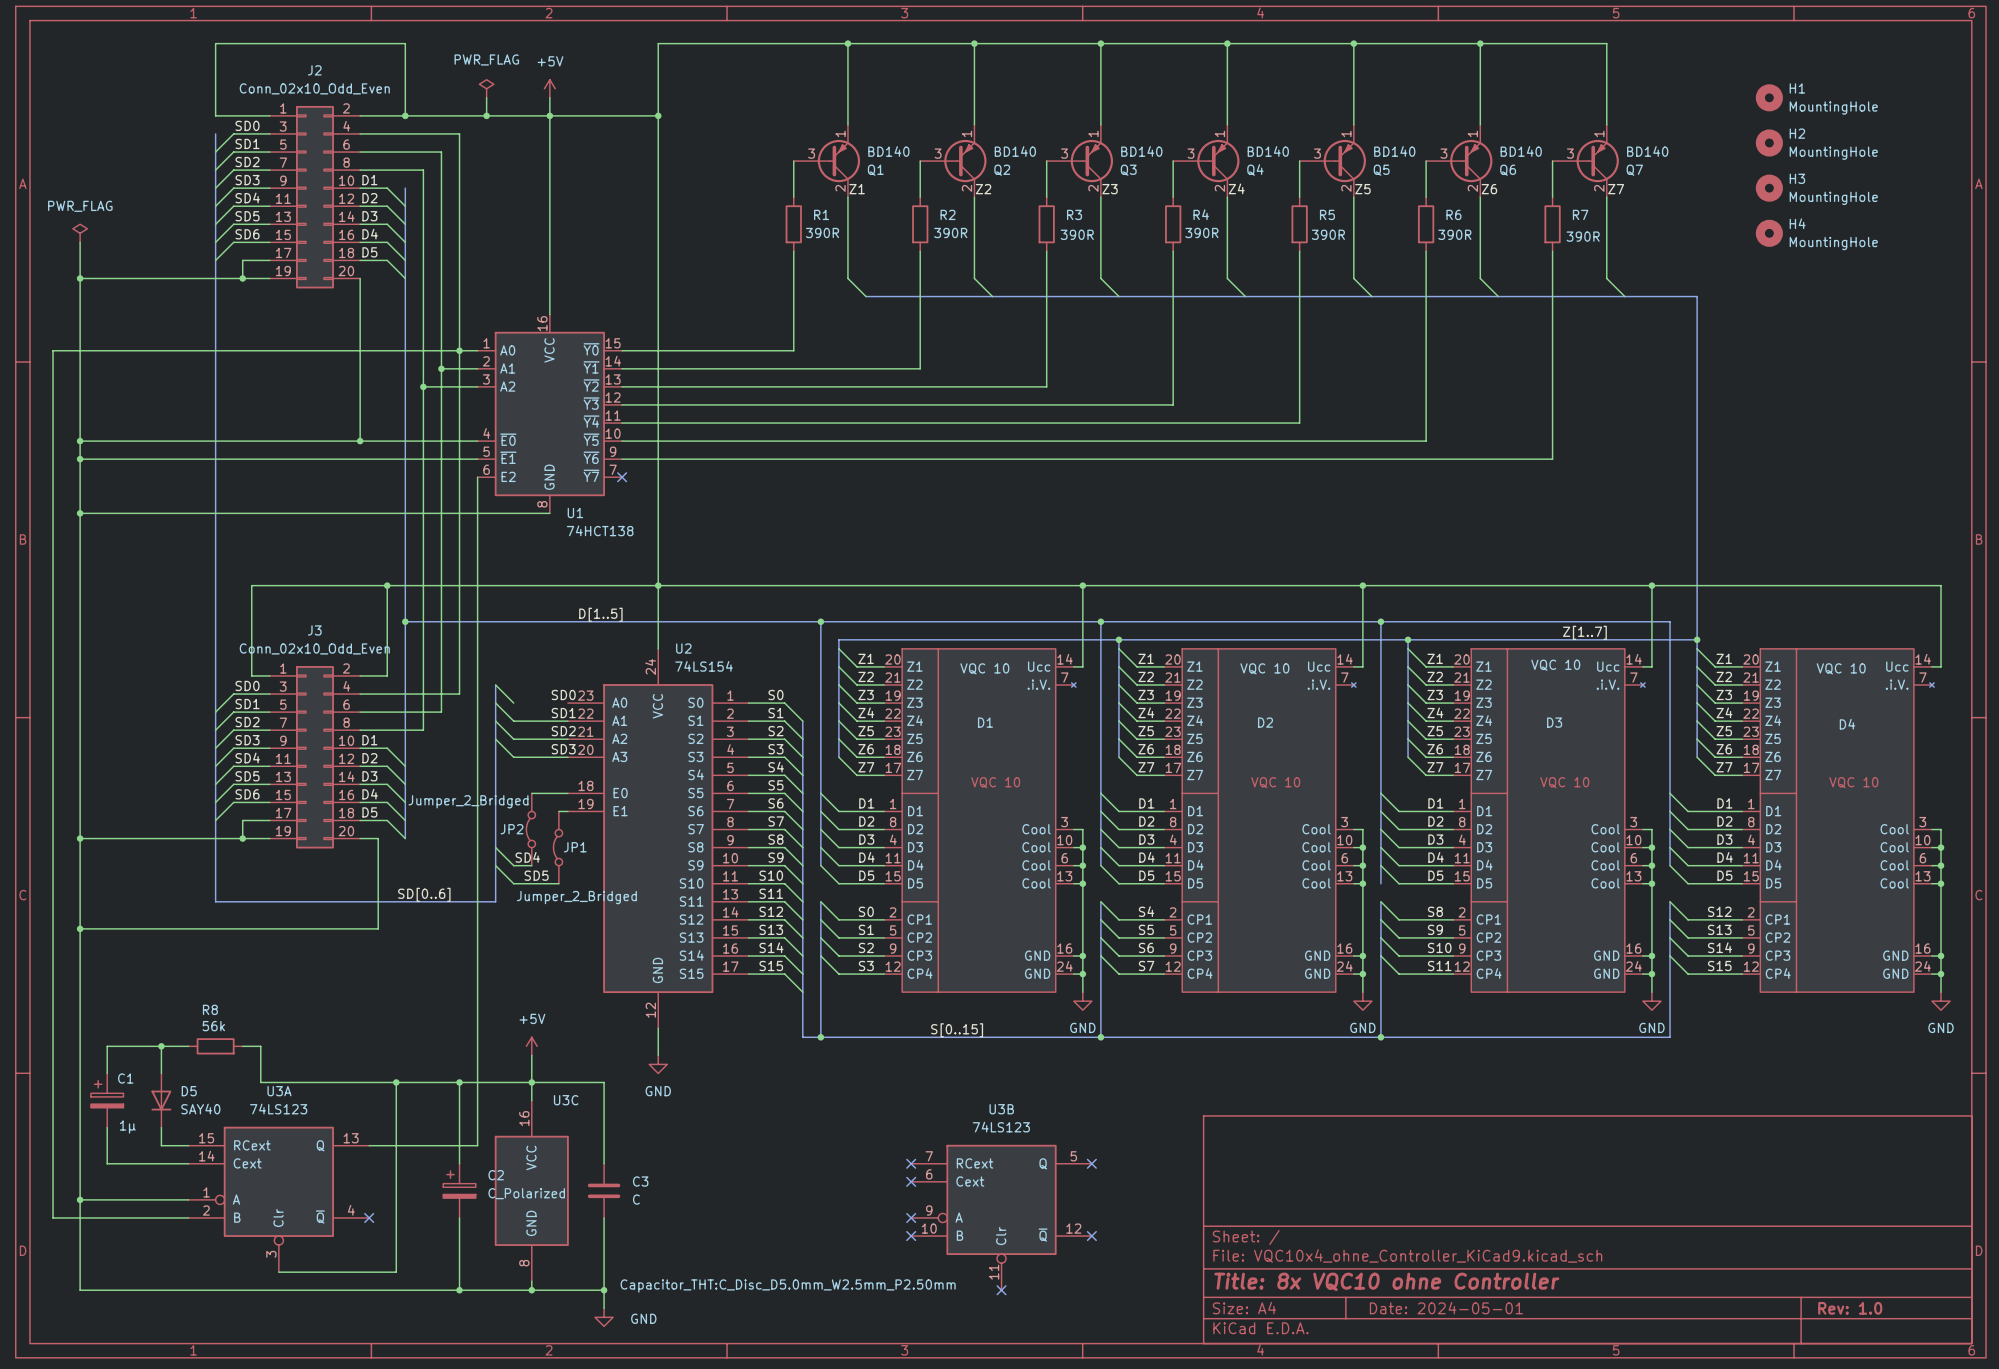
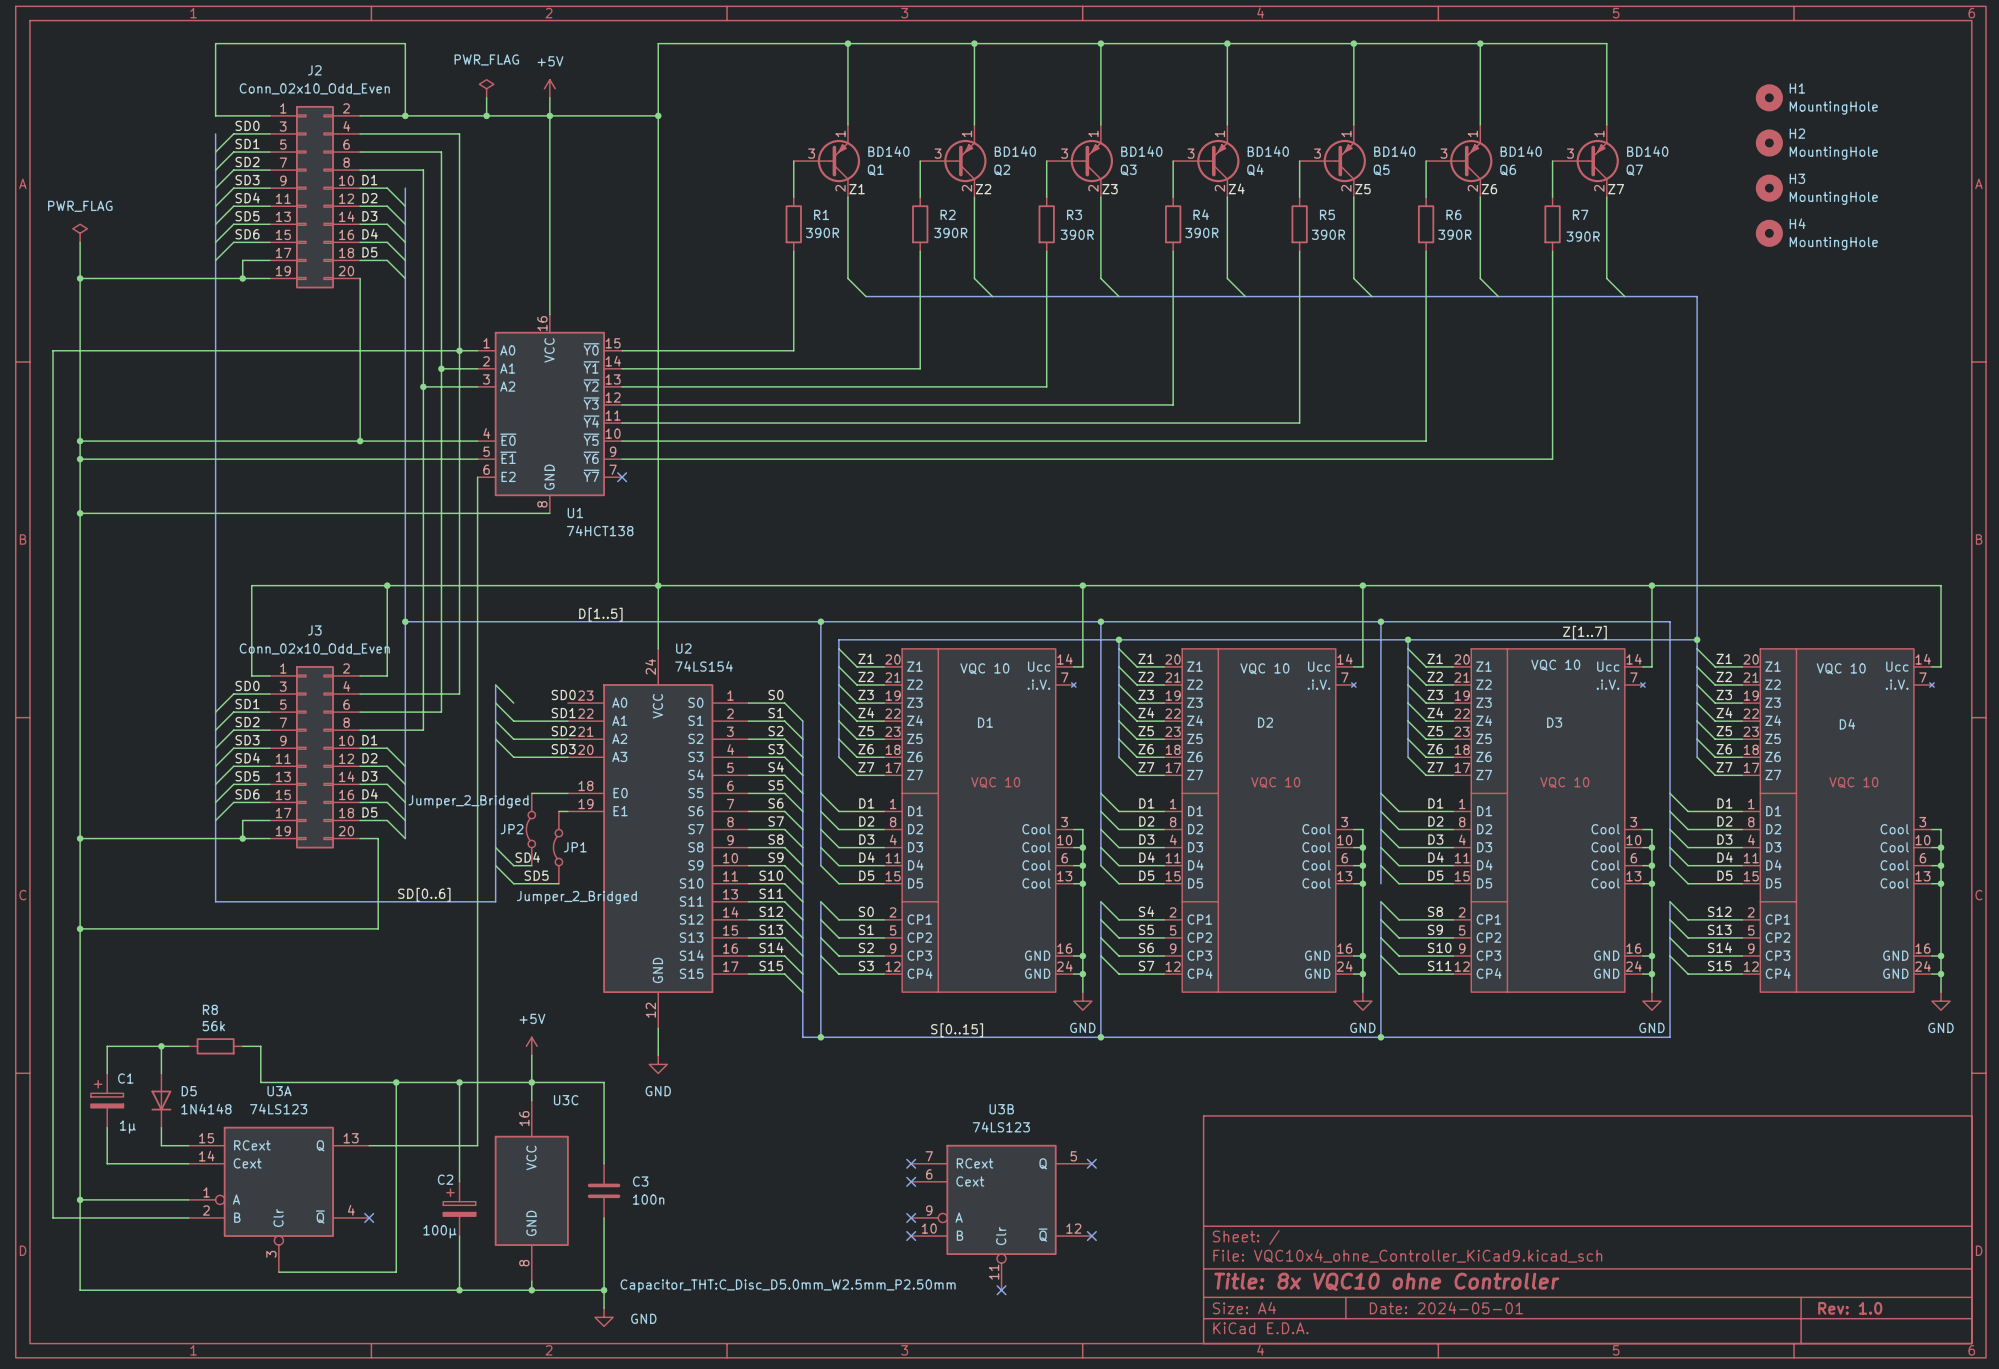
D5 value: SAY40 (200, 1109) -> 1N4148 (206, 1109)
C2 name position: C2 (496, 1175) -> C2 (445, 1179)
C2 position: (459, 1190) -> (459, 1208)
C2 value: C_Polarized (526, 1193) -> 100µ (439, 1231)
C3 value: C (636, 1199) -> 100n (648, 1199)

